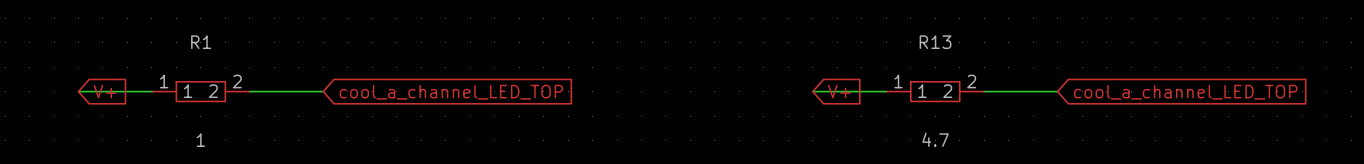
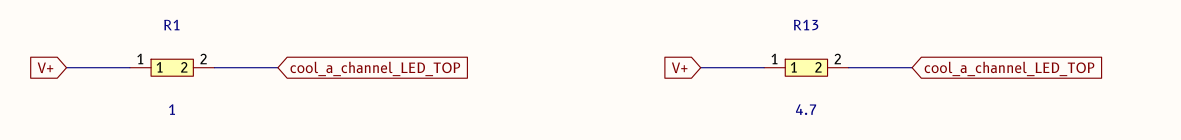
global label rotation: 0° (105, 91) -> 180° (45, 67)
global label position: V+ (105, 91) -> V+ (45, 67)
global label rotation: 0° (839, 91) -> 180° (679, 67)

